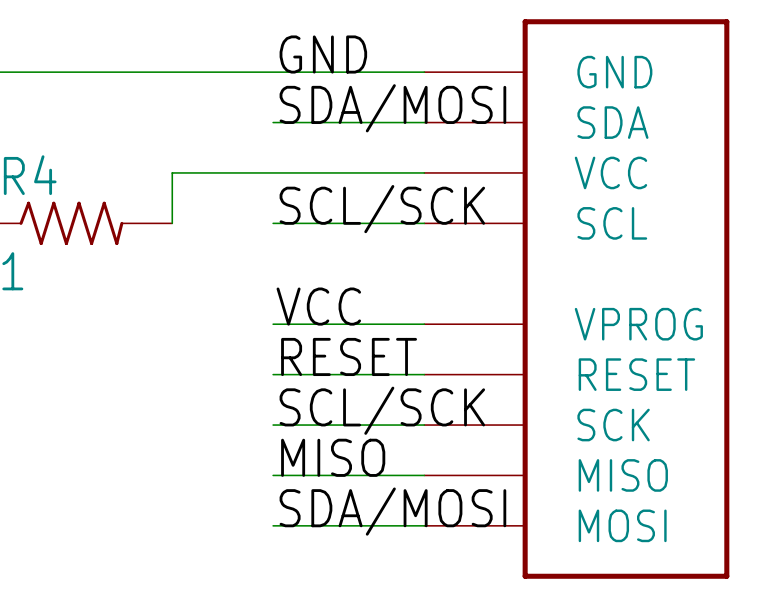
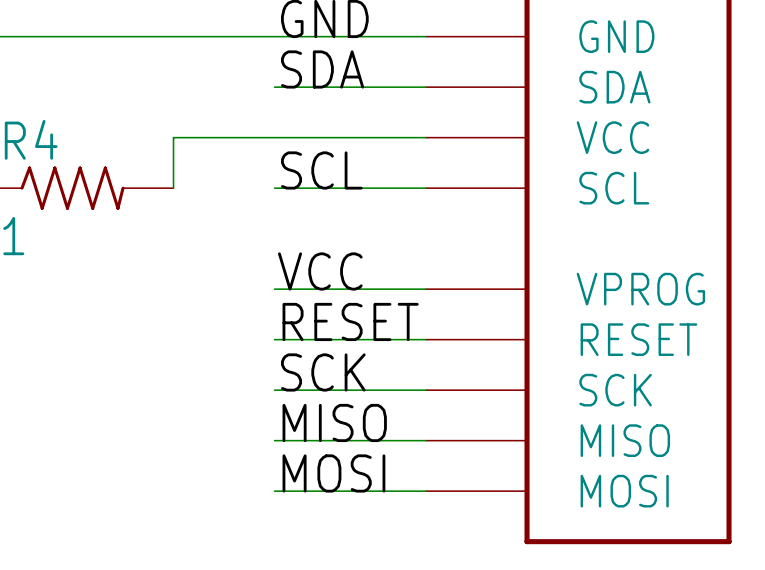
label: SDA/MOSI (392, 108) -> SDA (322, 69)
label: SCL/SCK (382, 209) -> SCL (321, 170)
label: SCL/SCK (382, 410) -> SCK (323, 372)
label: SDA/MOSI (392, 511) -> MOSI (333, 473)

